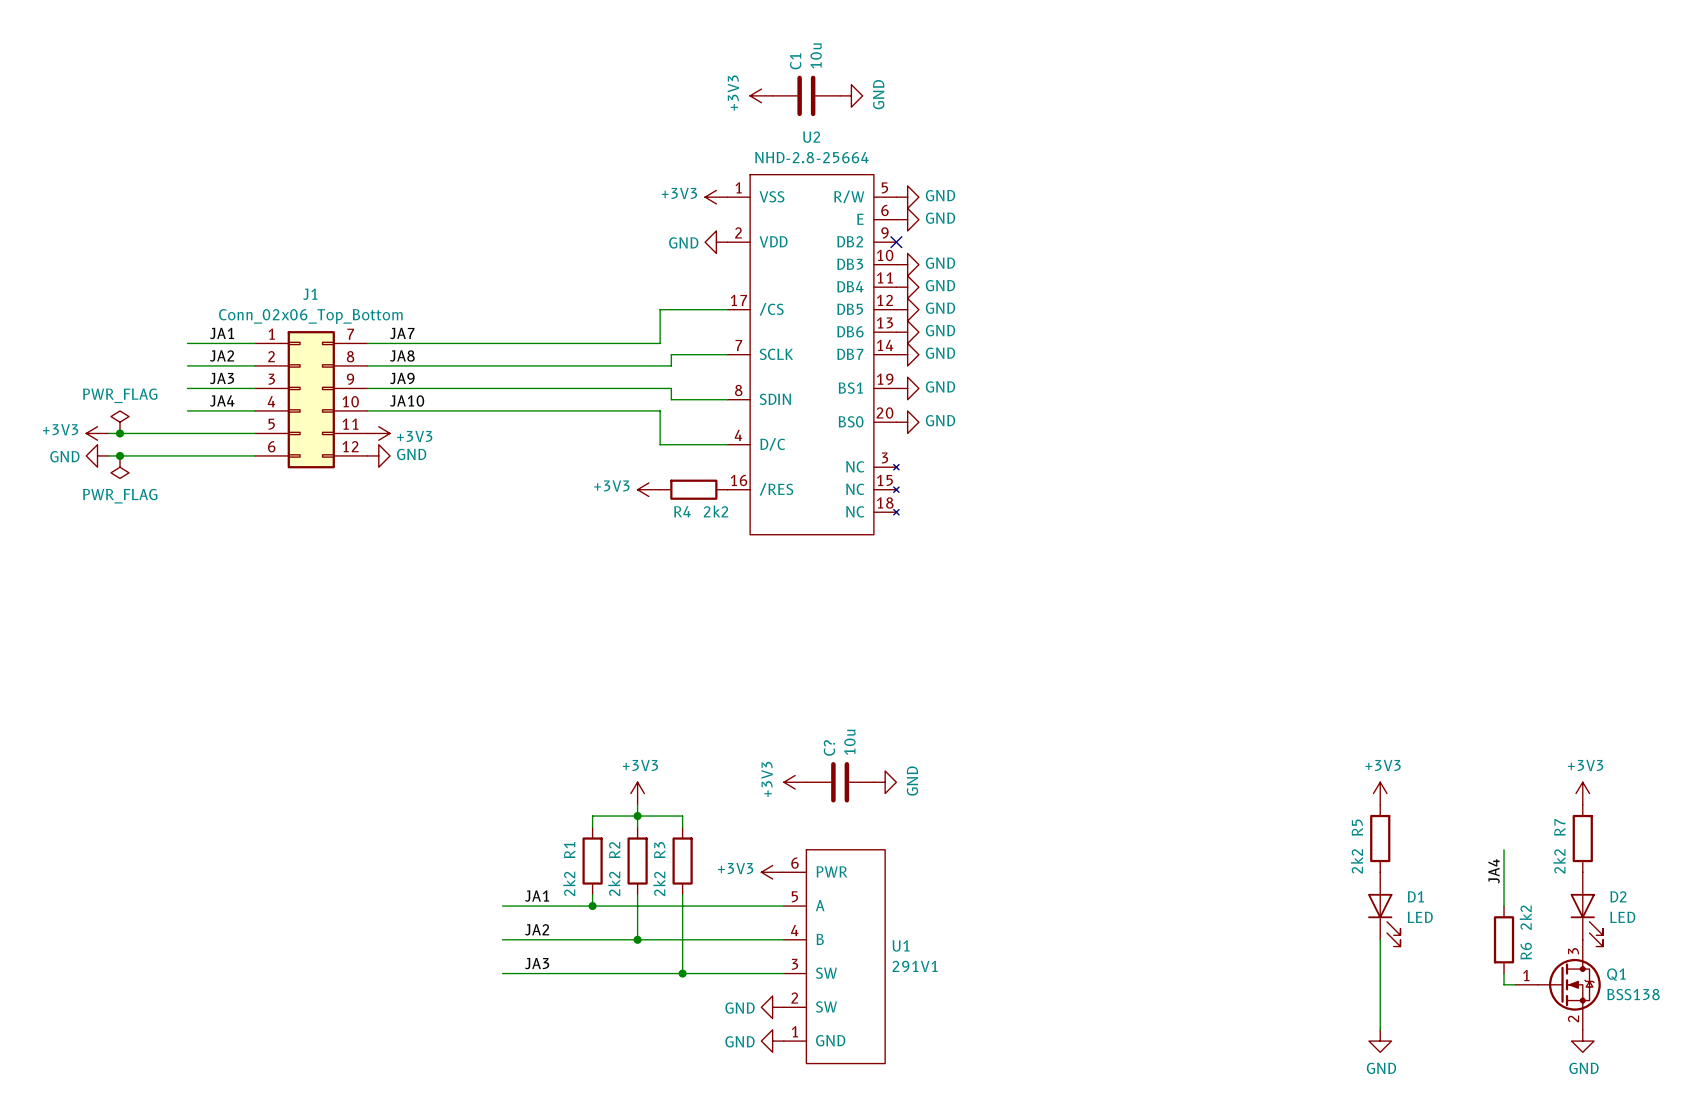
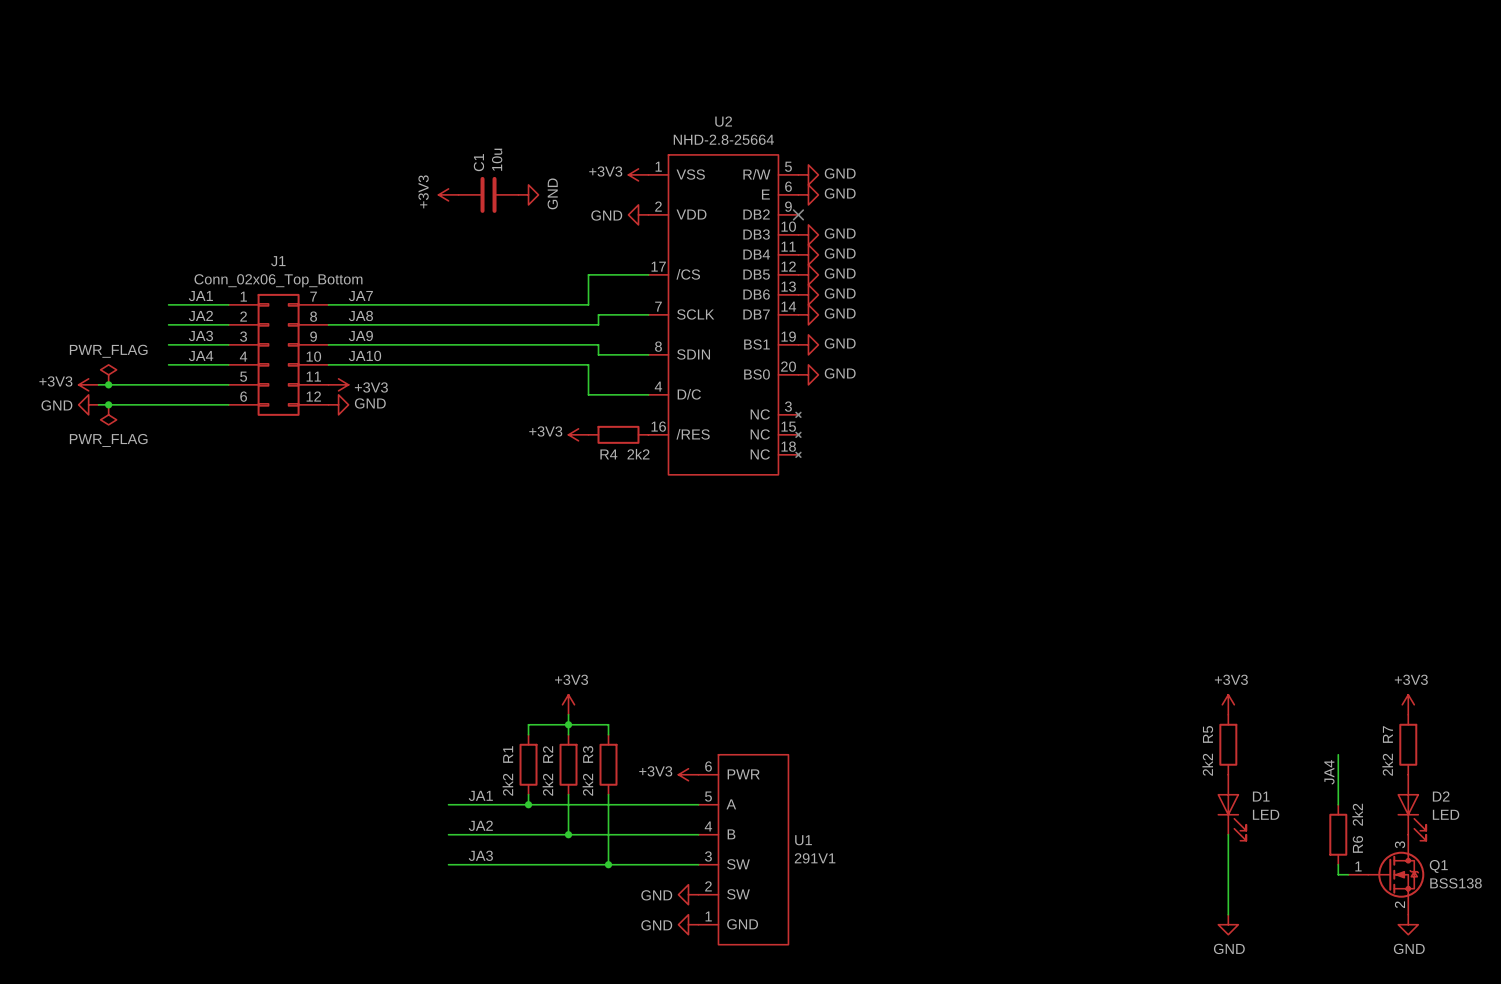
power symbol: +3V3 (761, 95) -> none
C1 position: (806, 95) -> (488, 194)
power symbol: GND (851, 95) -> none
power symbol: none -> +3V3 (448, 194)
power symbol: none -> GND (528, 194)
power symbol: +3V3 (795, 782) -> none
C?: 10u (840, 782) -> none
power symbol: GND (885, 782) -> none

